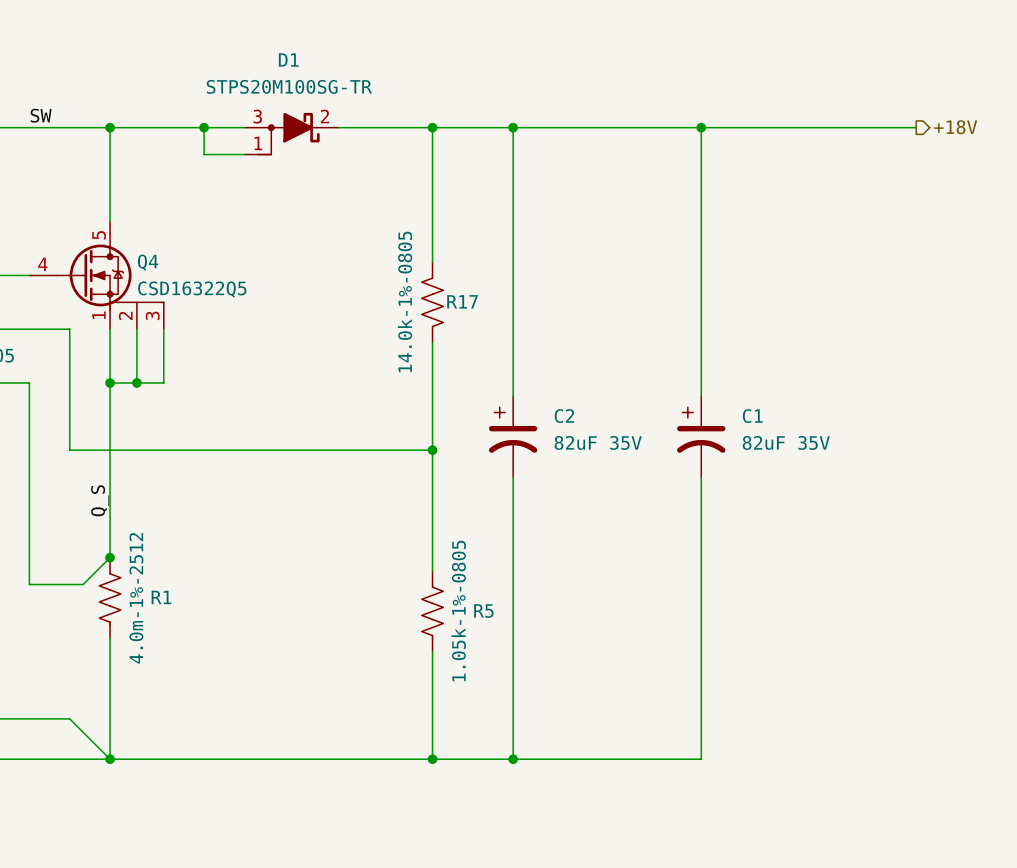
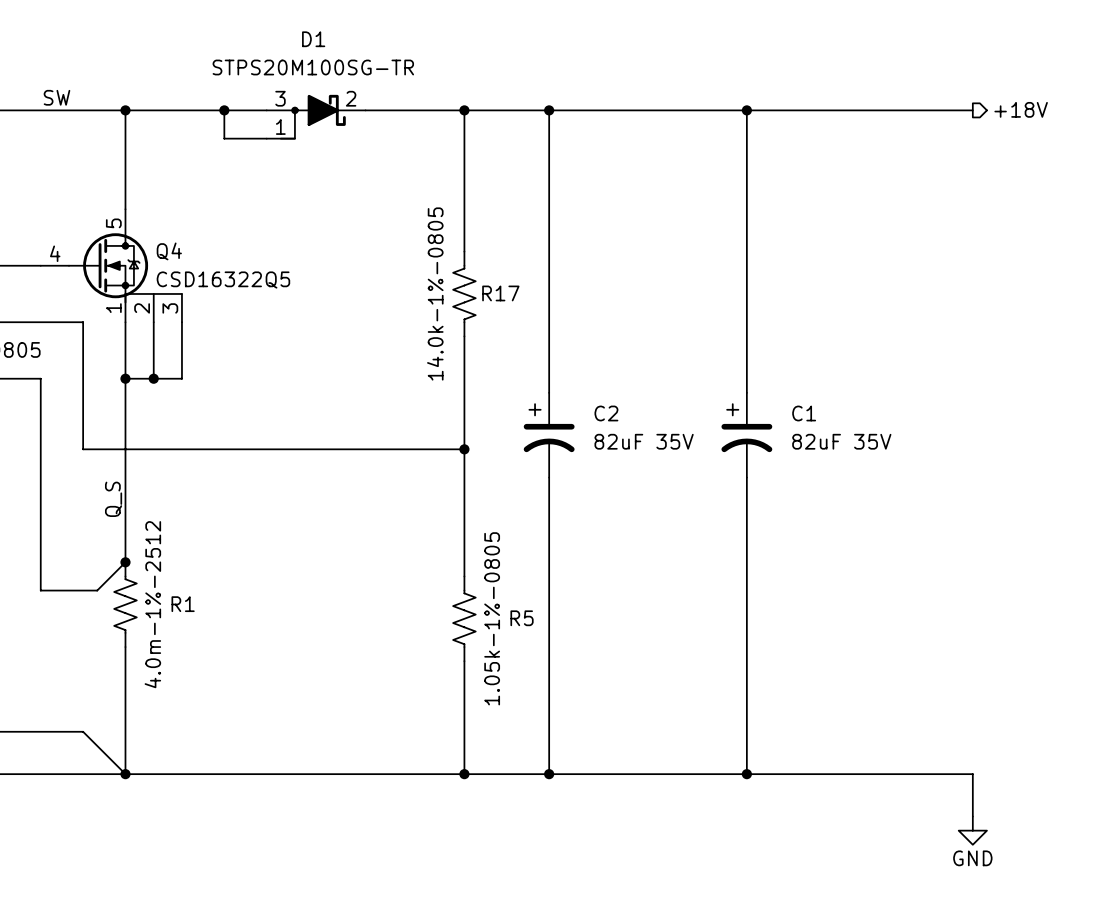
wire: none -> (746, 774) (972, 774) (972, 816)
junction: none -> (746, 774)
power symbol: none -> GND (972, 830)

